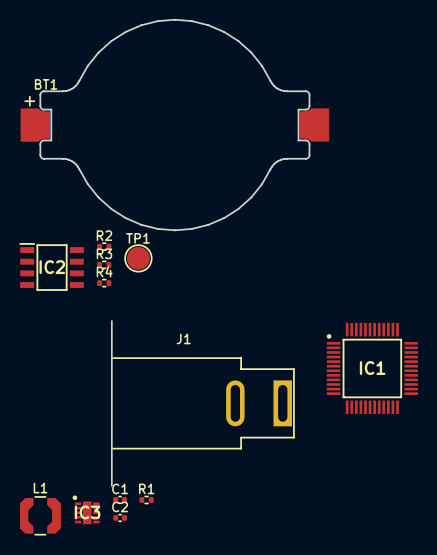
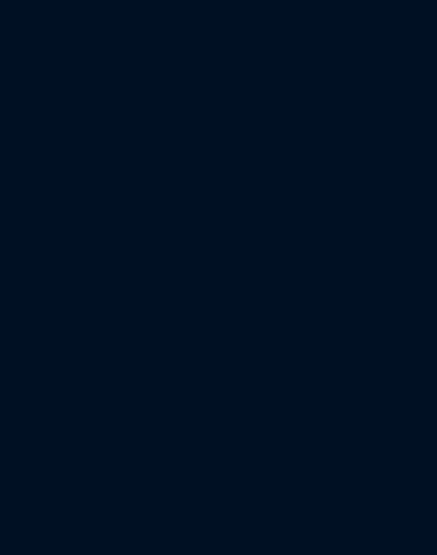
BT1: (174, 125) -> none
R2: (104, 246) -> none
TP1: (138, 258) -> none
R3: (104, 264) -> none
IC2: (51, 266) -> none
R4: (104, 283) -> none
IC1: (372, 368) -> none
J1: (202, 403) -> none
C1: (120, 499) -> none
R1: (146, 499) -> none
IC3: (86, 509) -> none
L1: (40, 515) -> none
C2: (120, 517) -> none

